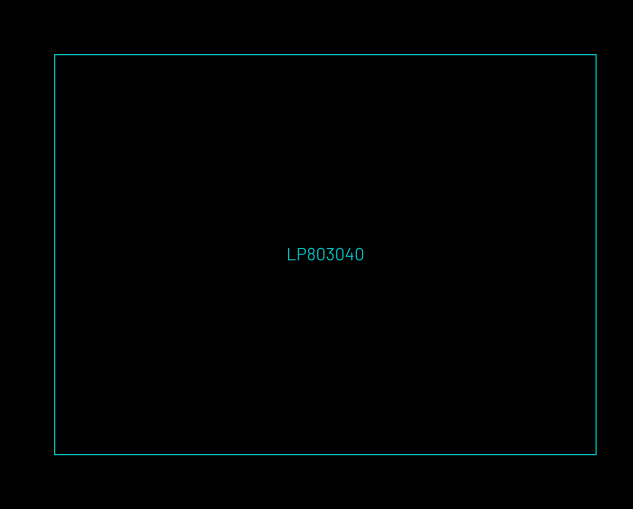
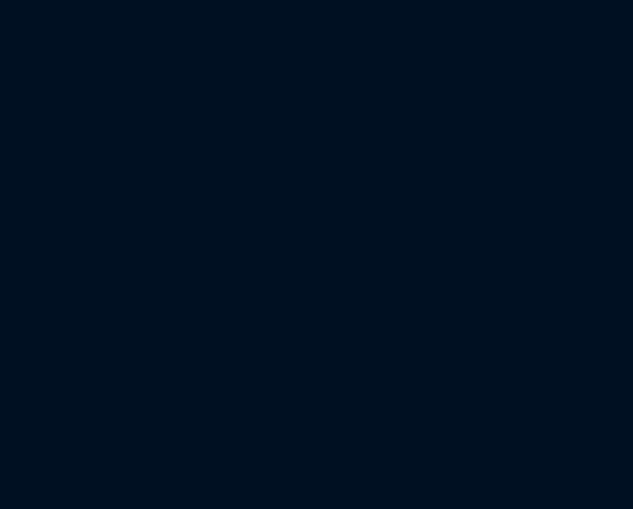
drawing: [54, 54, 597, 456] -> none

